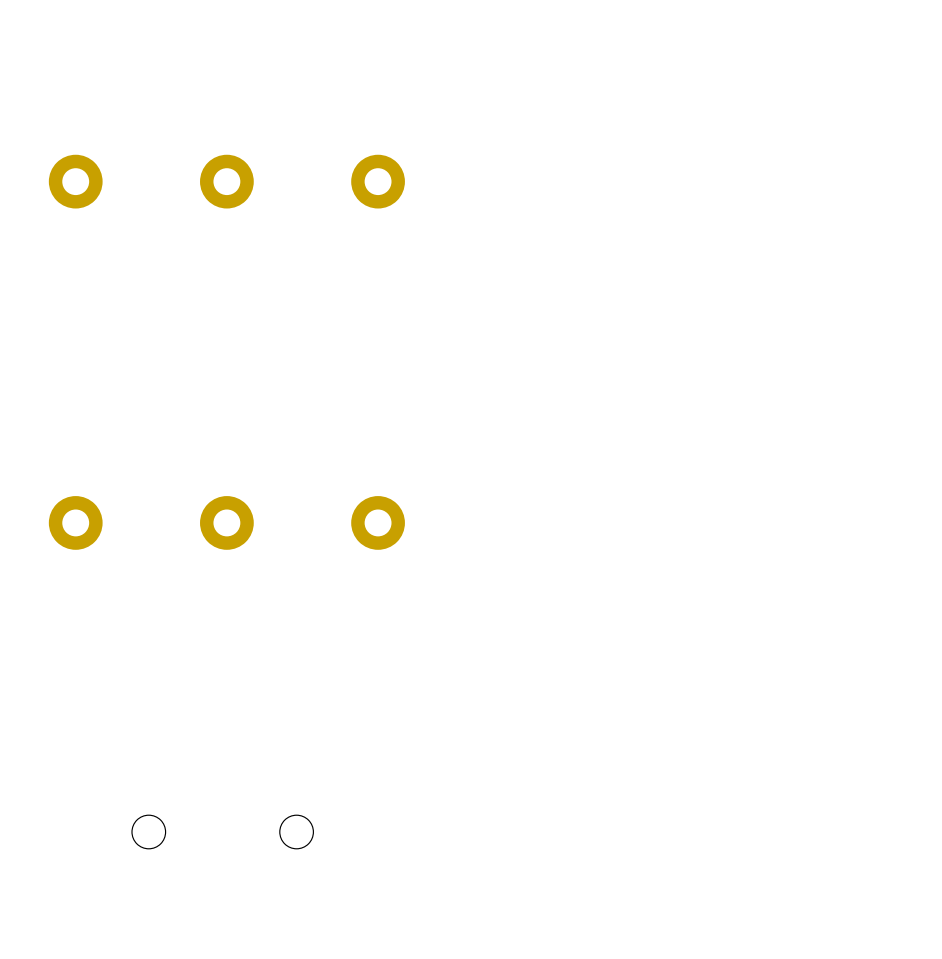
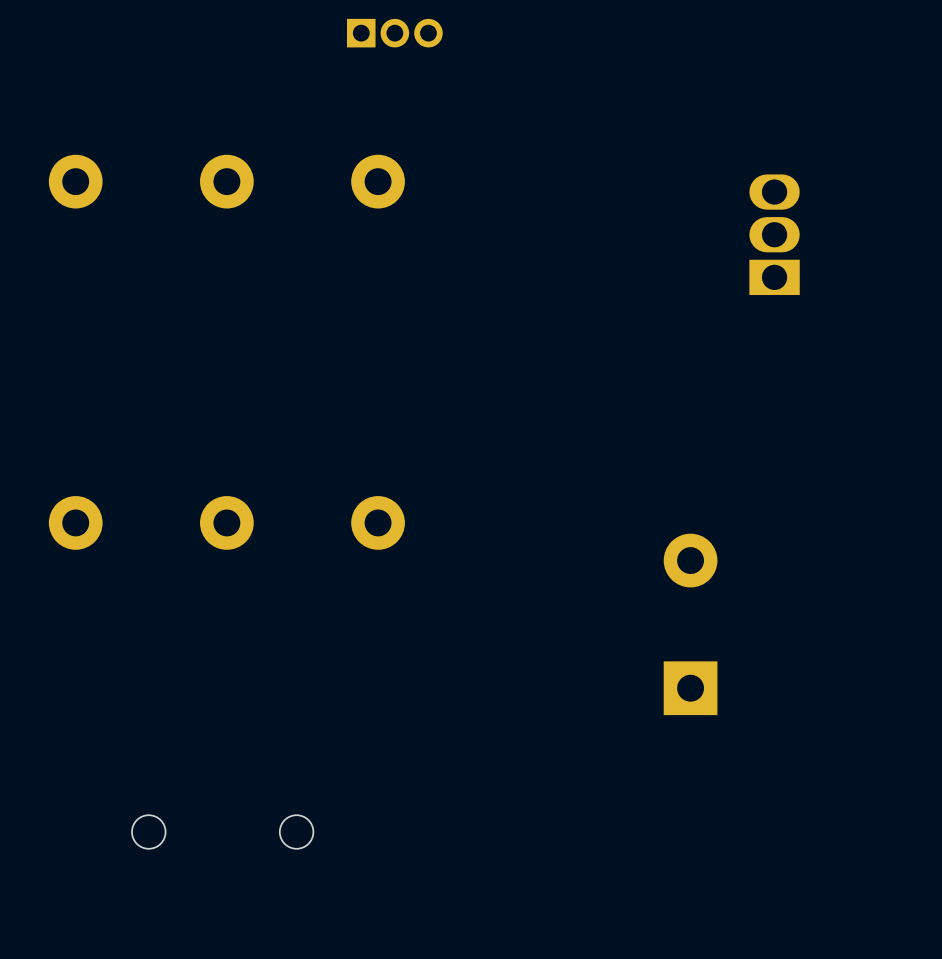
part: none -> (394, 33)
part: none -> (774, 234)
part: none -> (690, 624)

